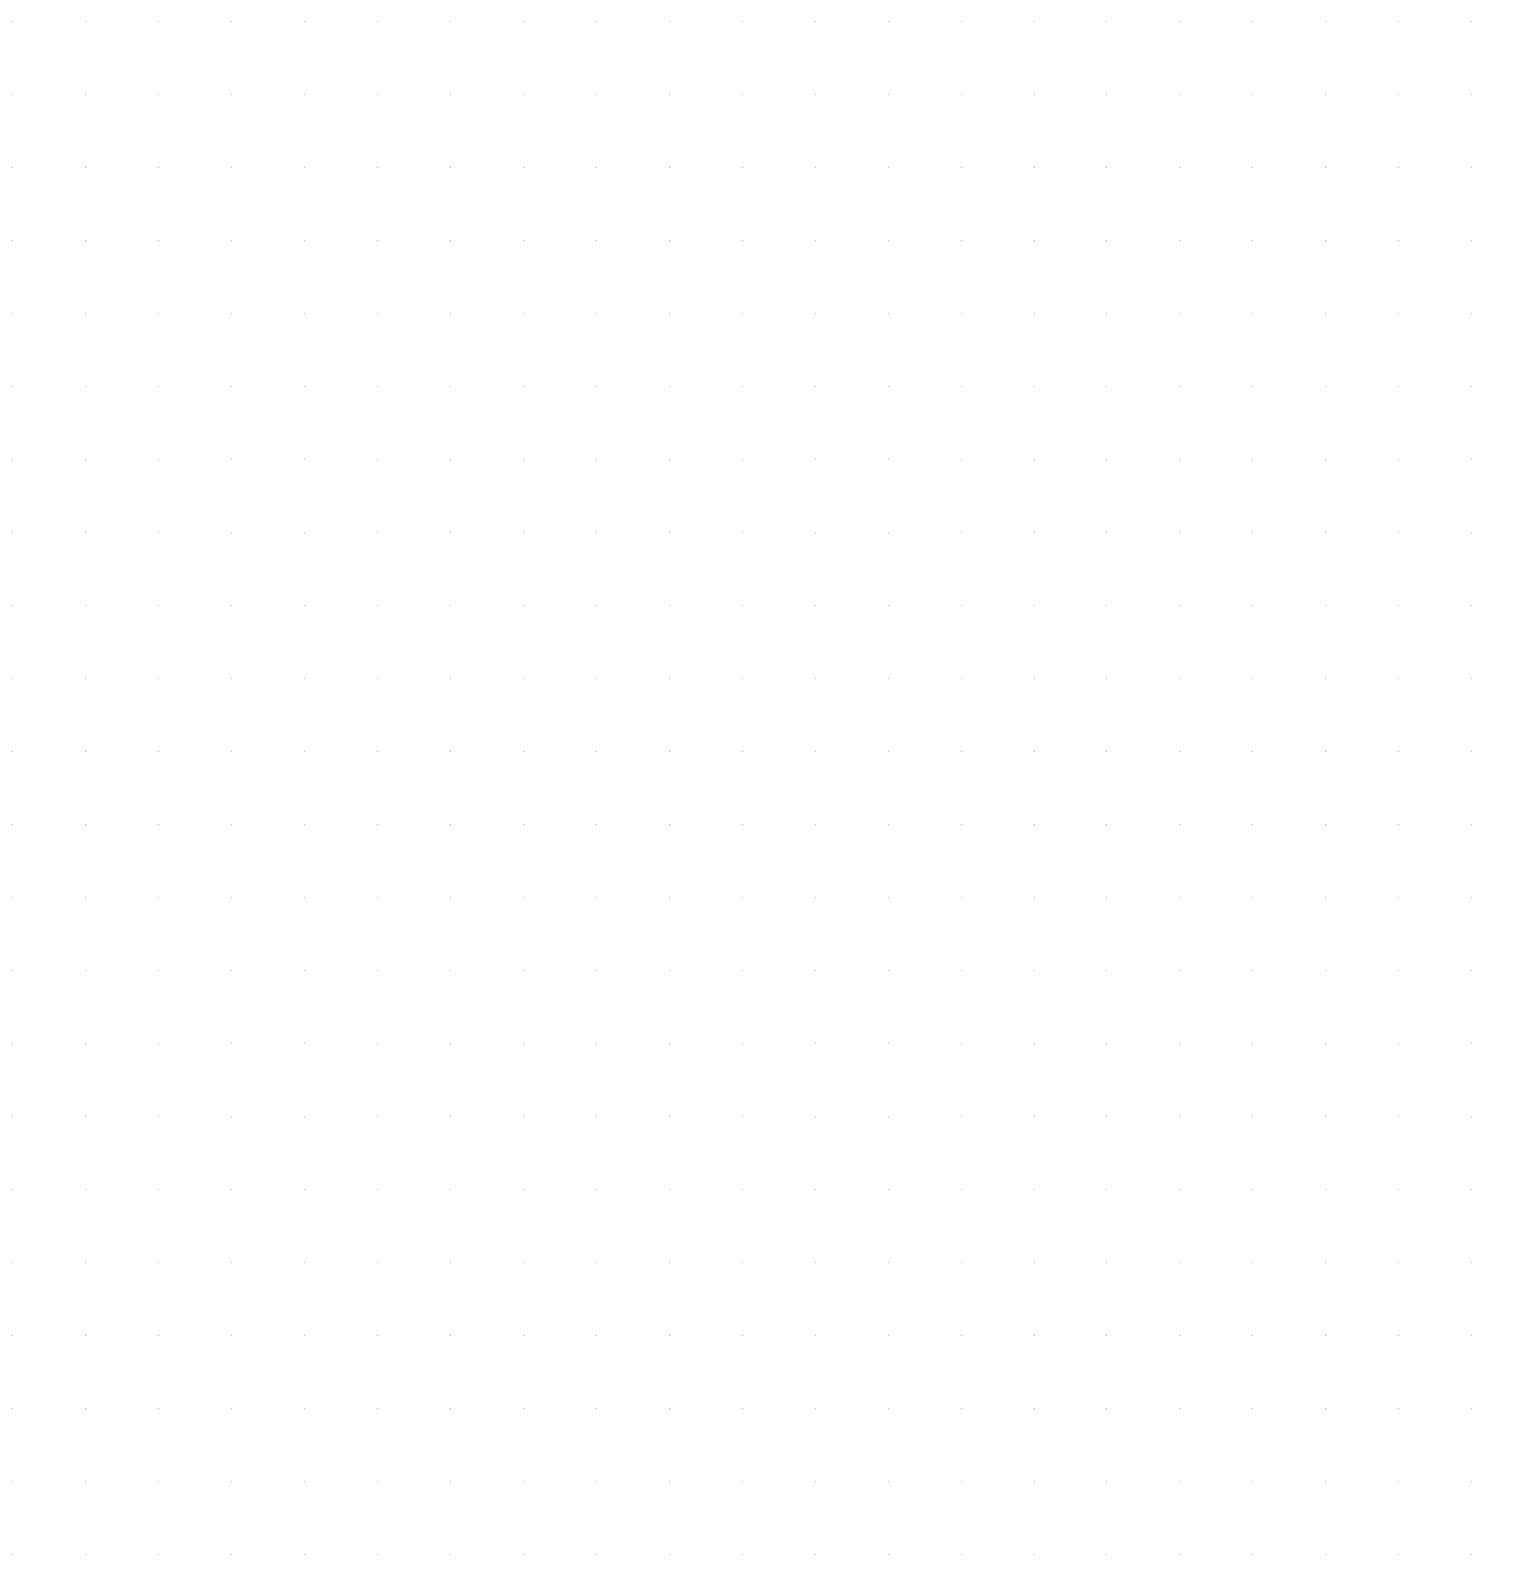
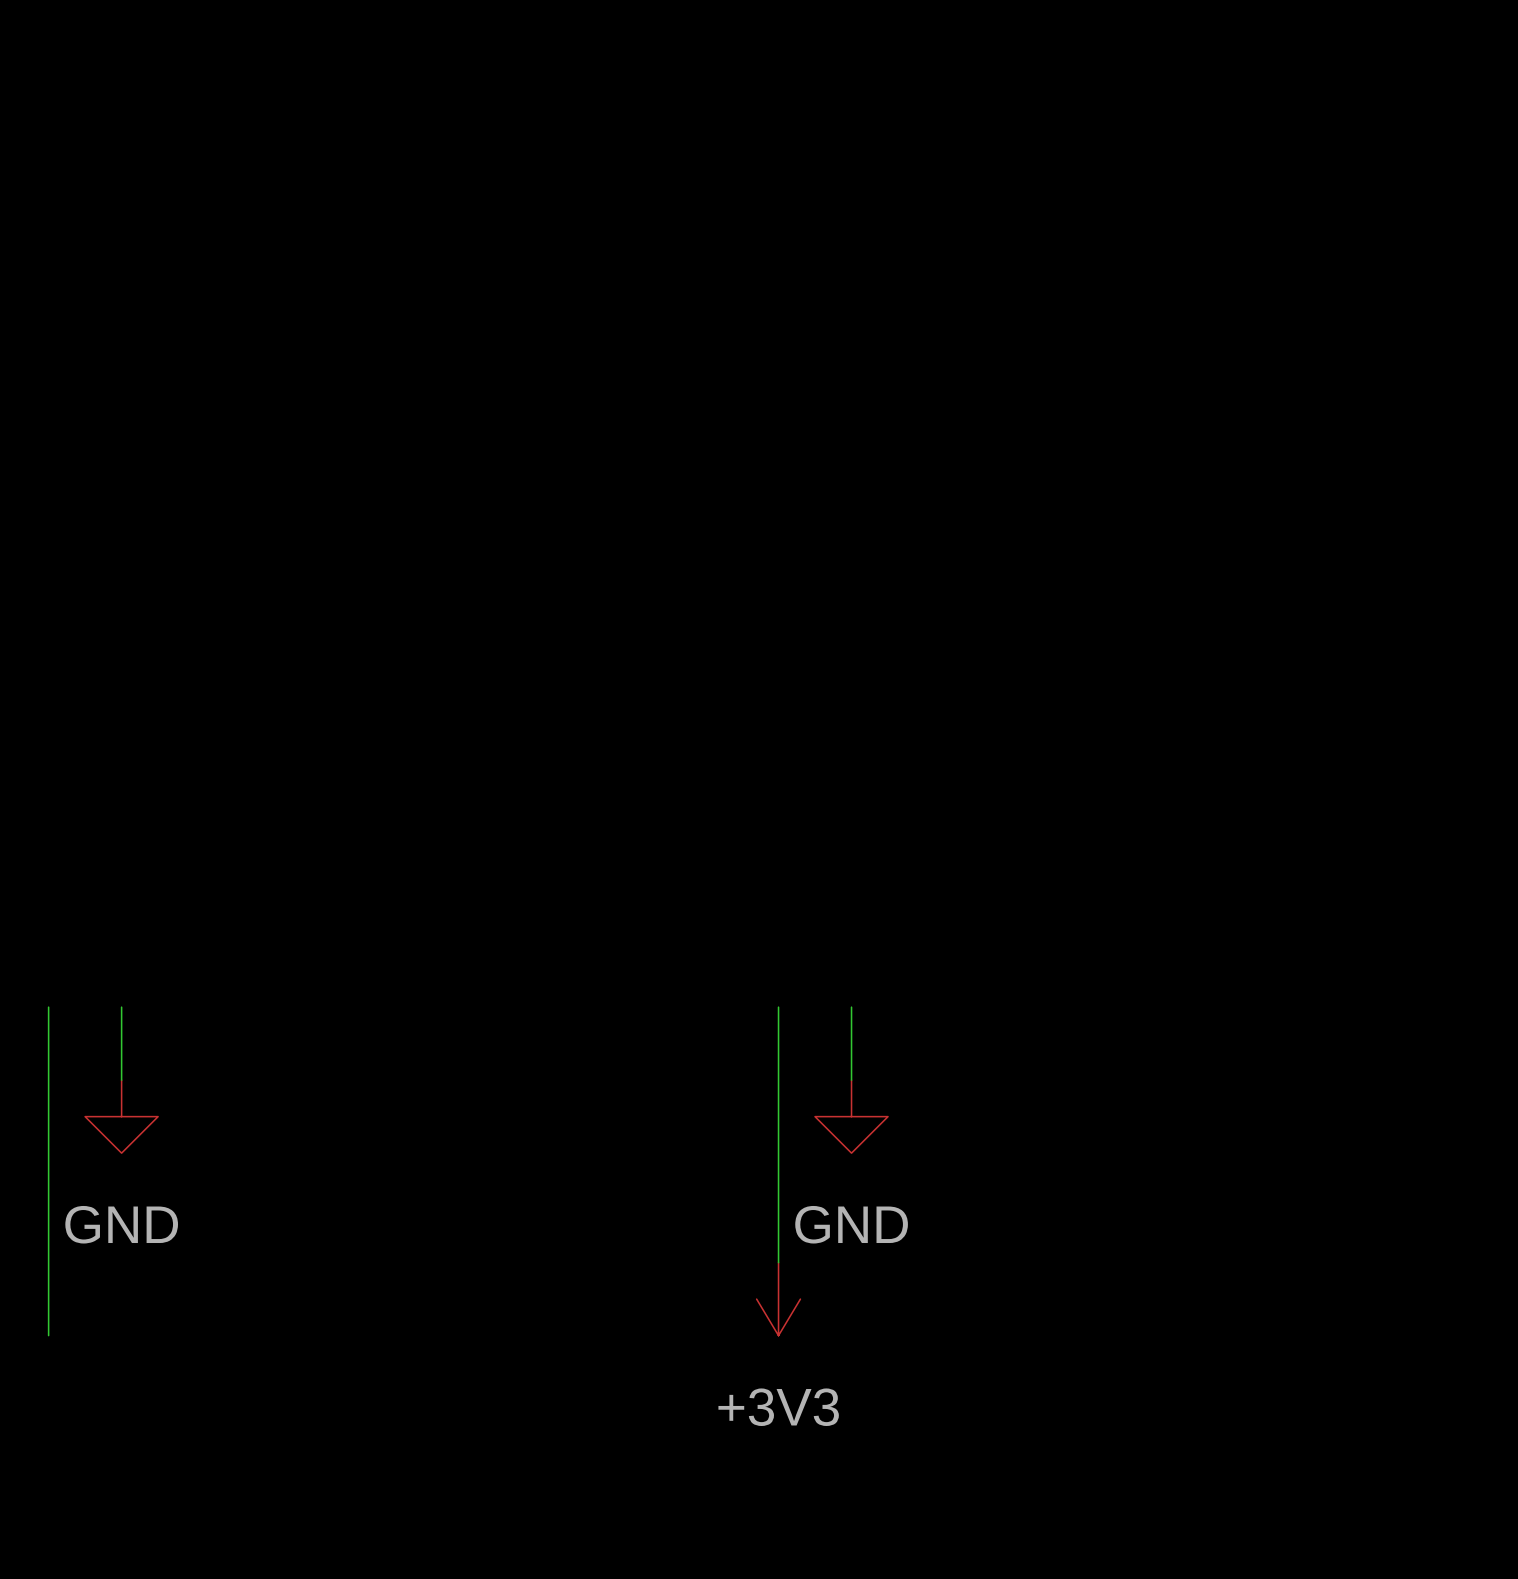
wire: none -> (48, 1007) (48, 1335)
wire: none -> (121, 1007) (121, 1080)
wire: none -> (778, 1007) (778, 1262)
wire: none -> (851, 1007) (851, 1080)
power symbol: none -> GND (121, 1116)
power symbol: none -> GND (851, 1116)
power symbol: none -> +3V3 (778, 1299)

